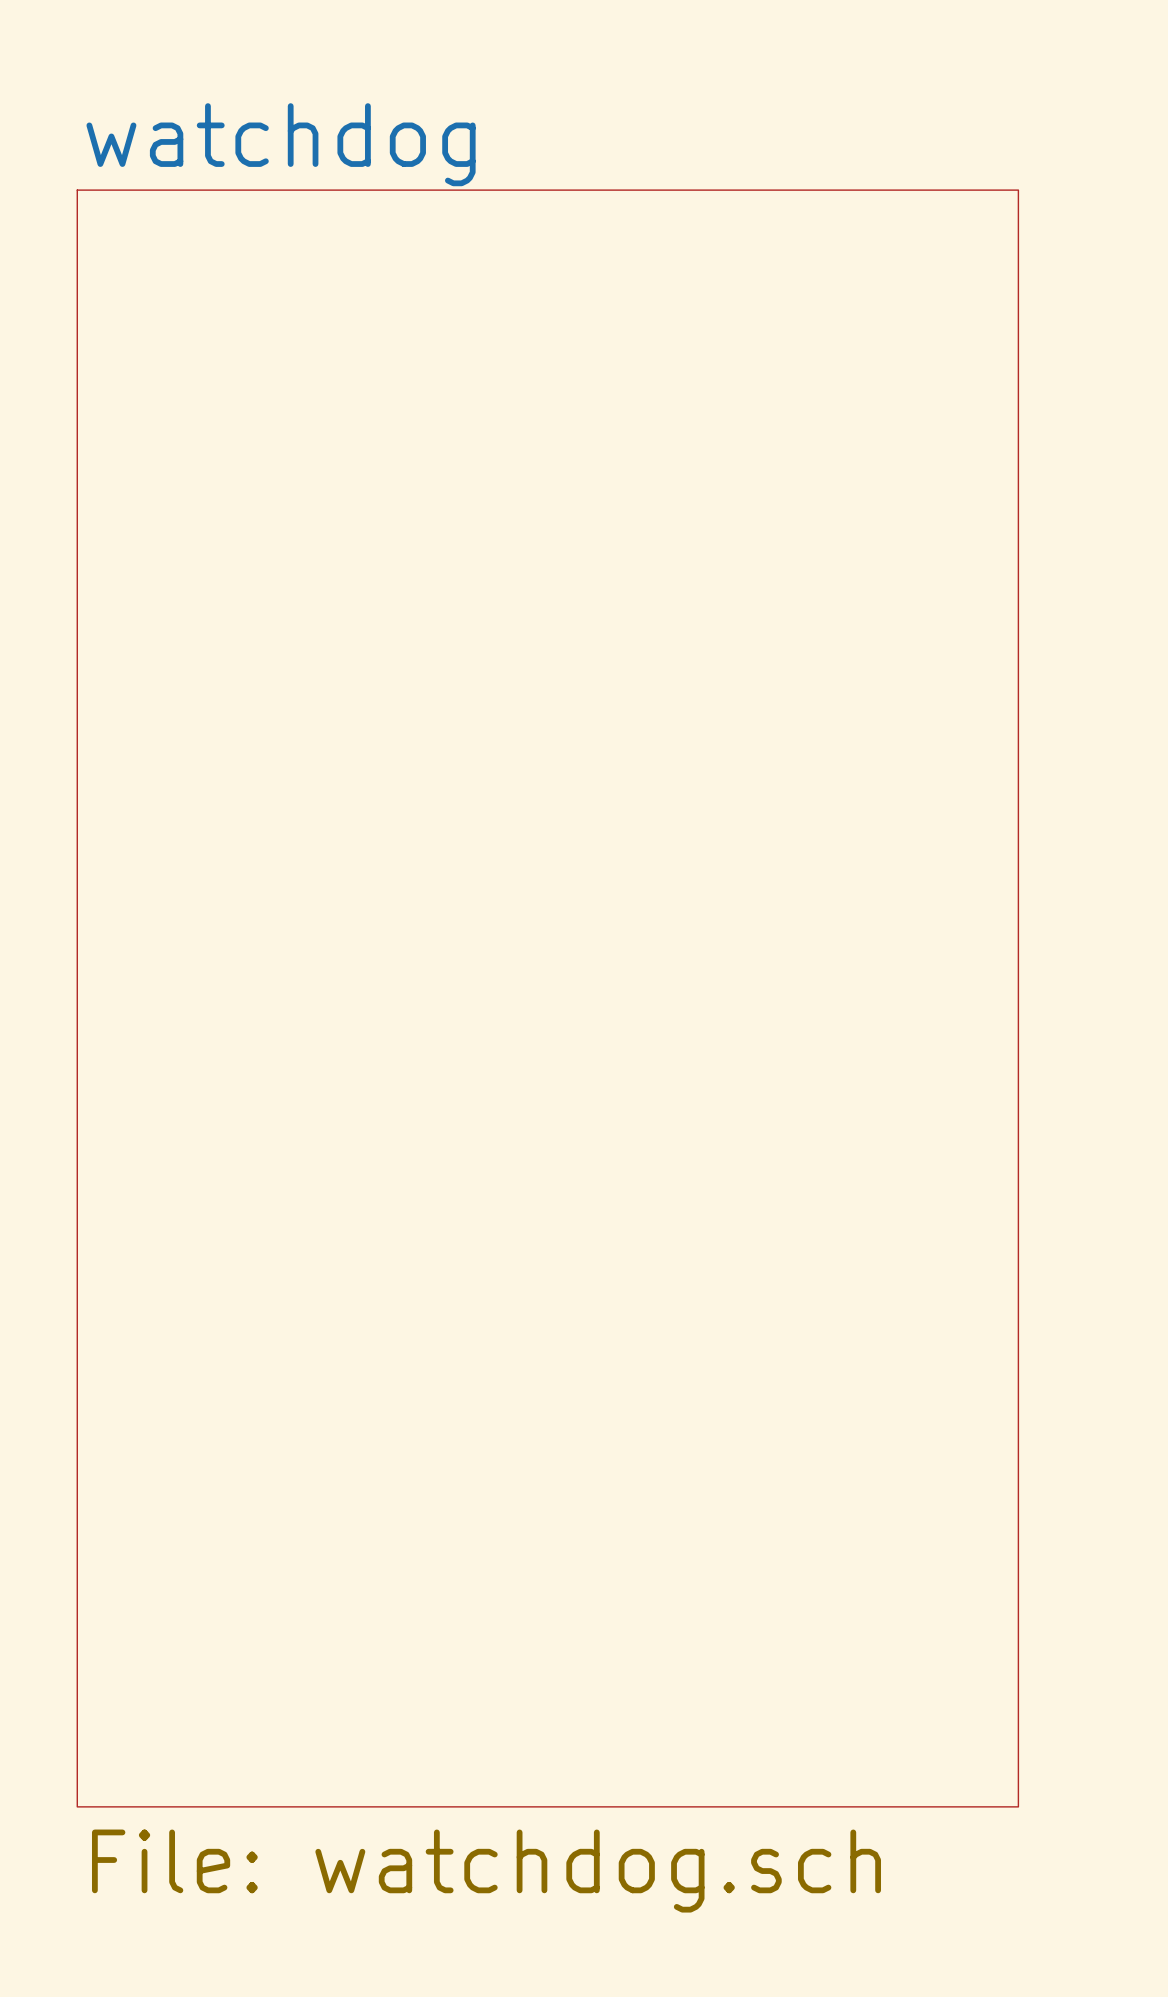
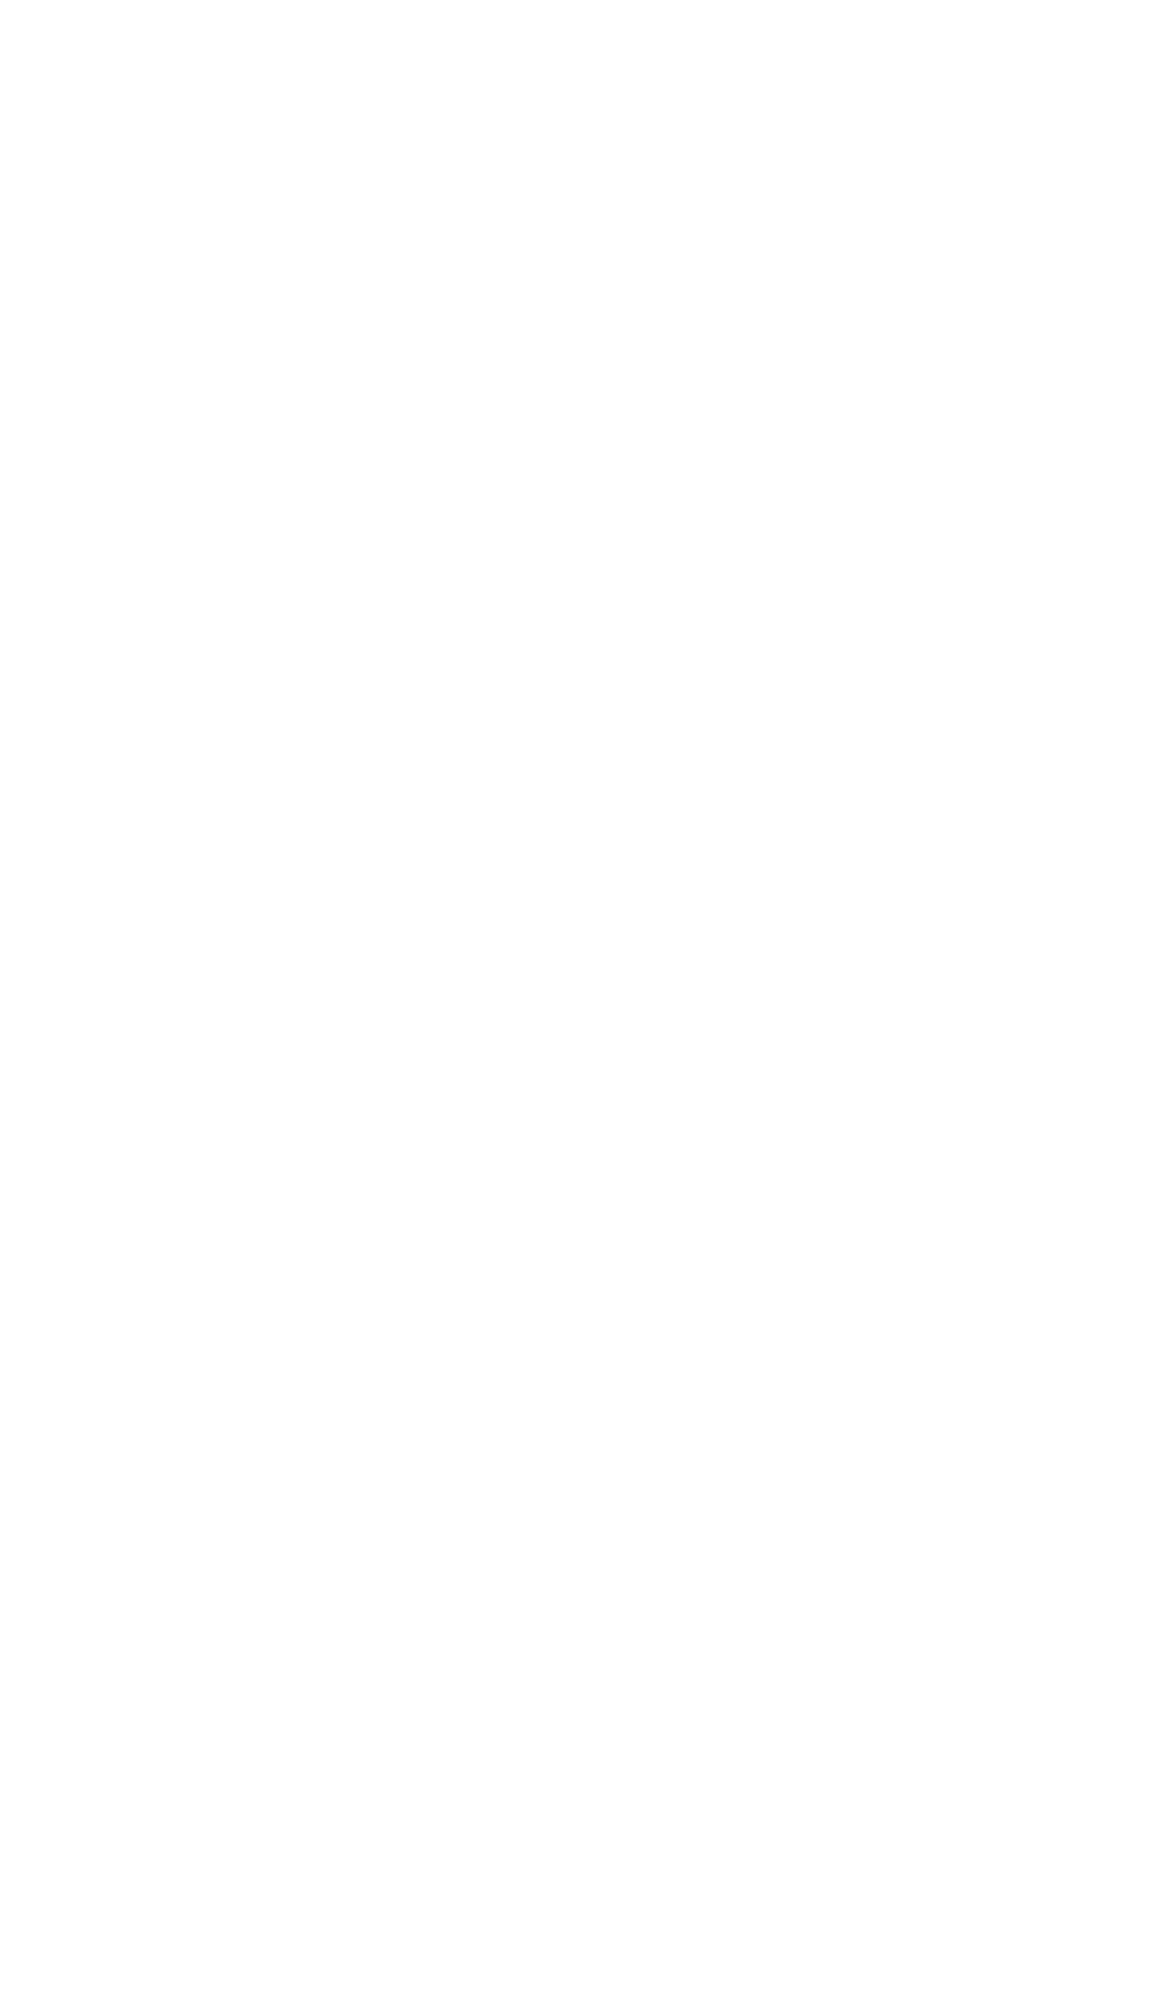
sheet watchdog: File: watchdog.sch (547, 998) -> none

